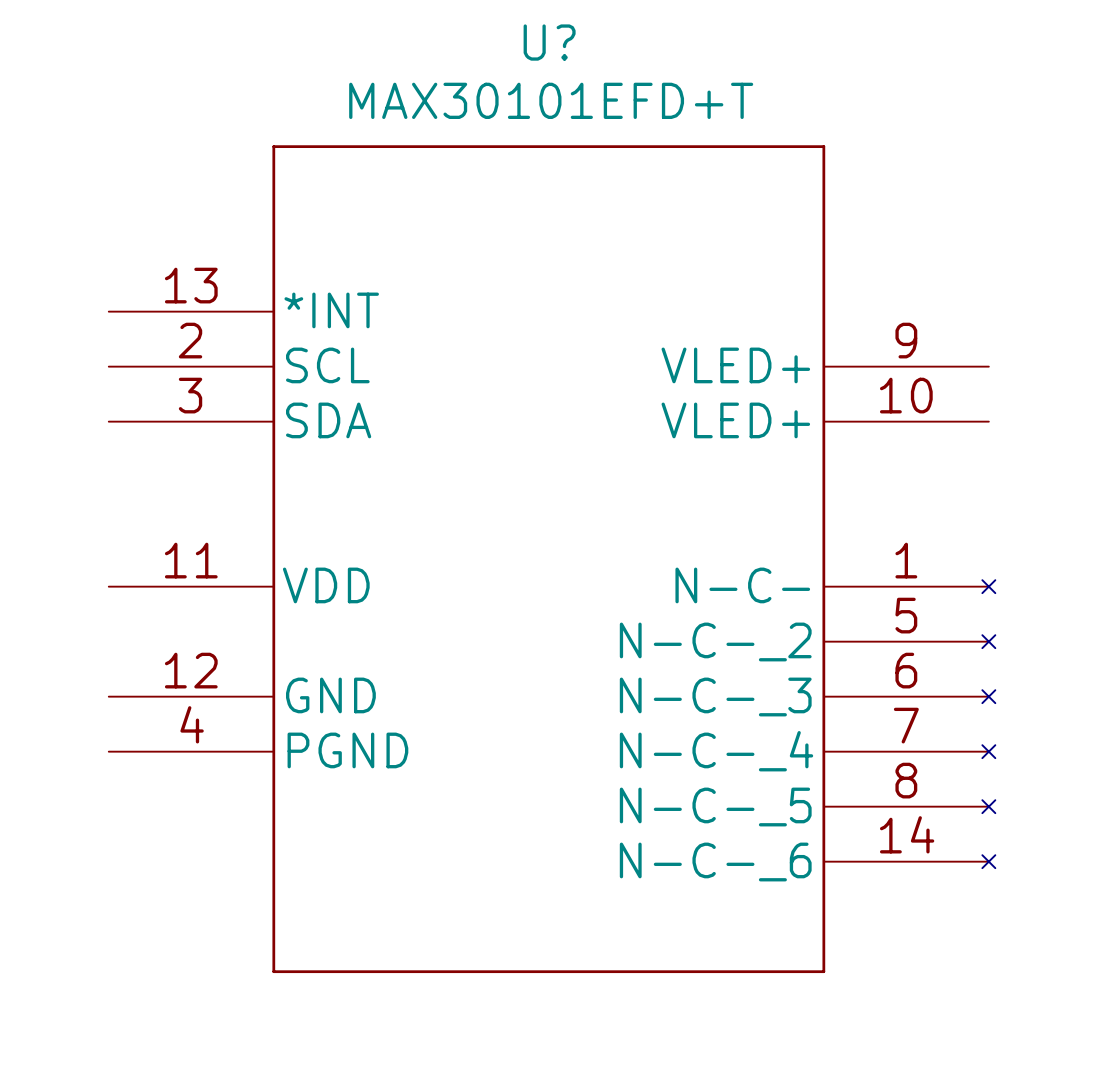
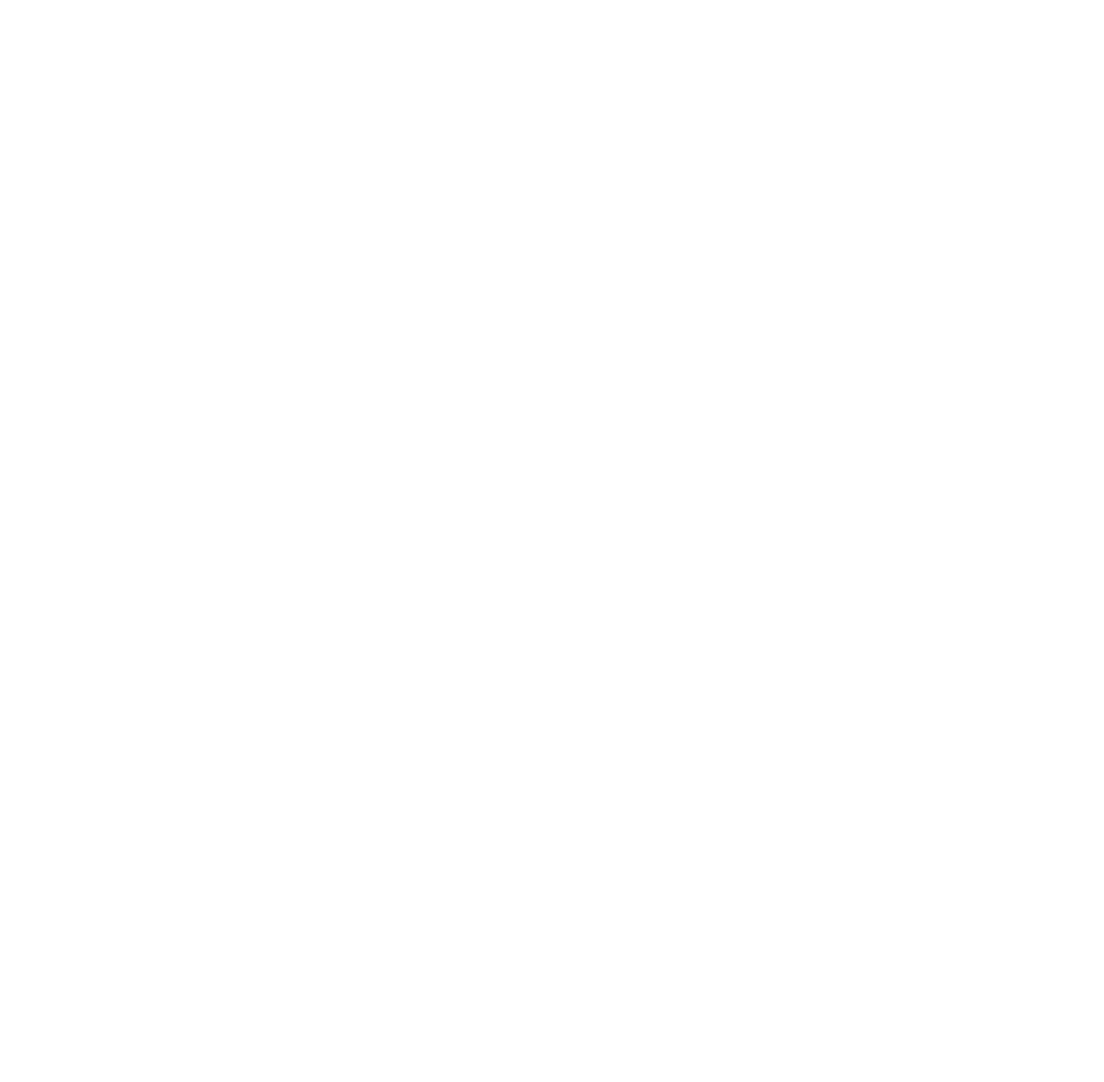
U?: MAX30101EFD+T (552, 559) -> none

